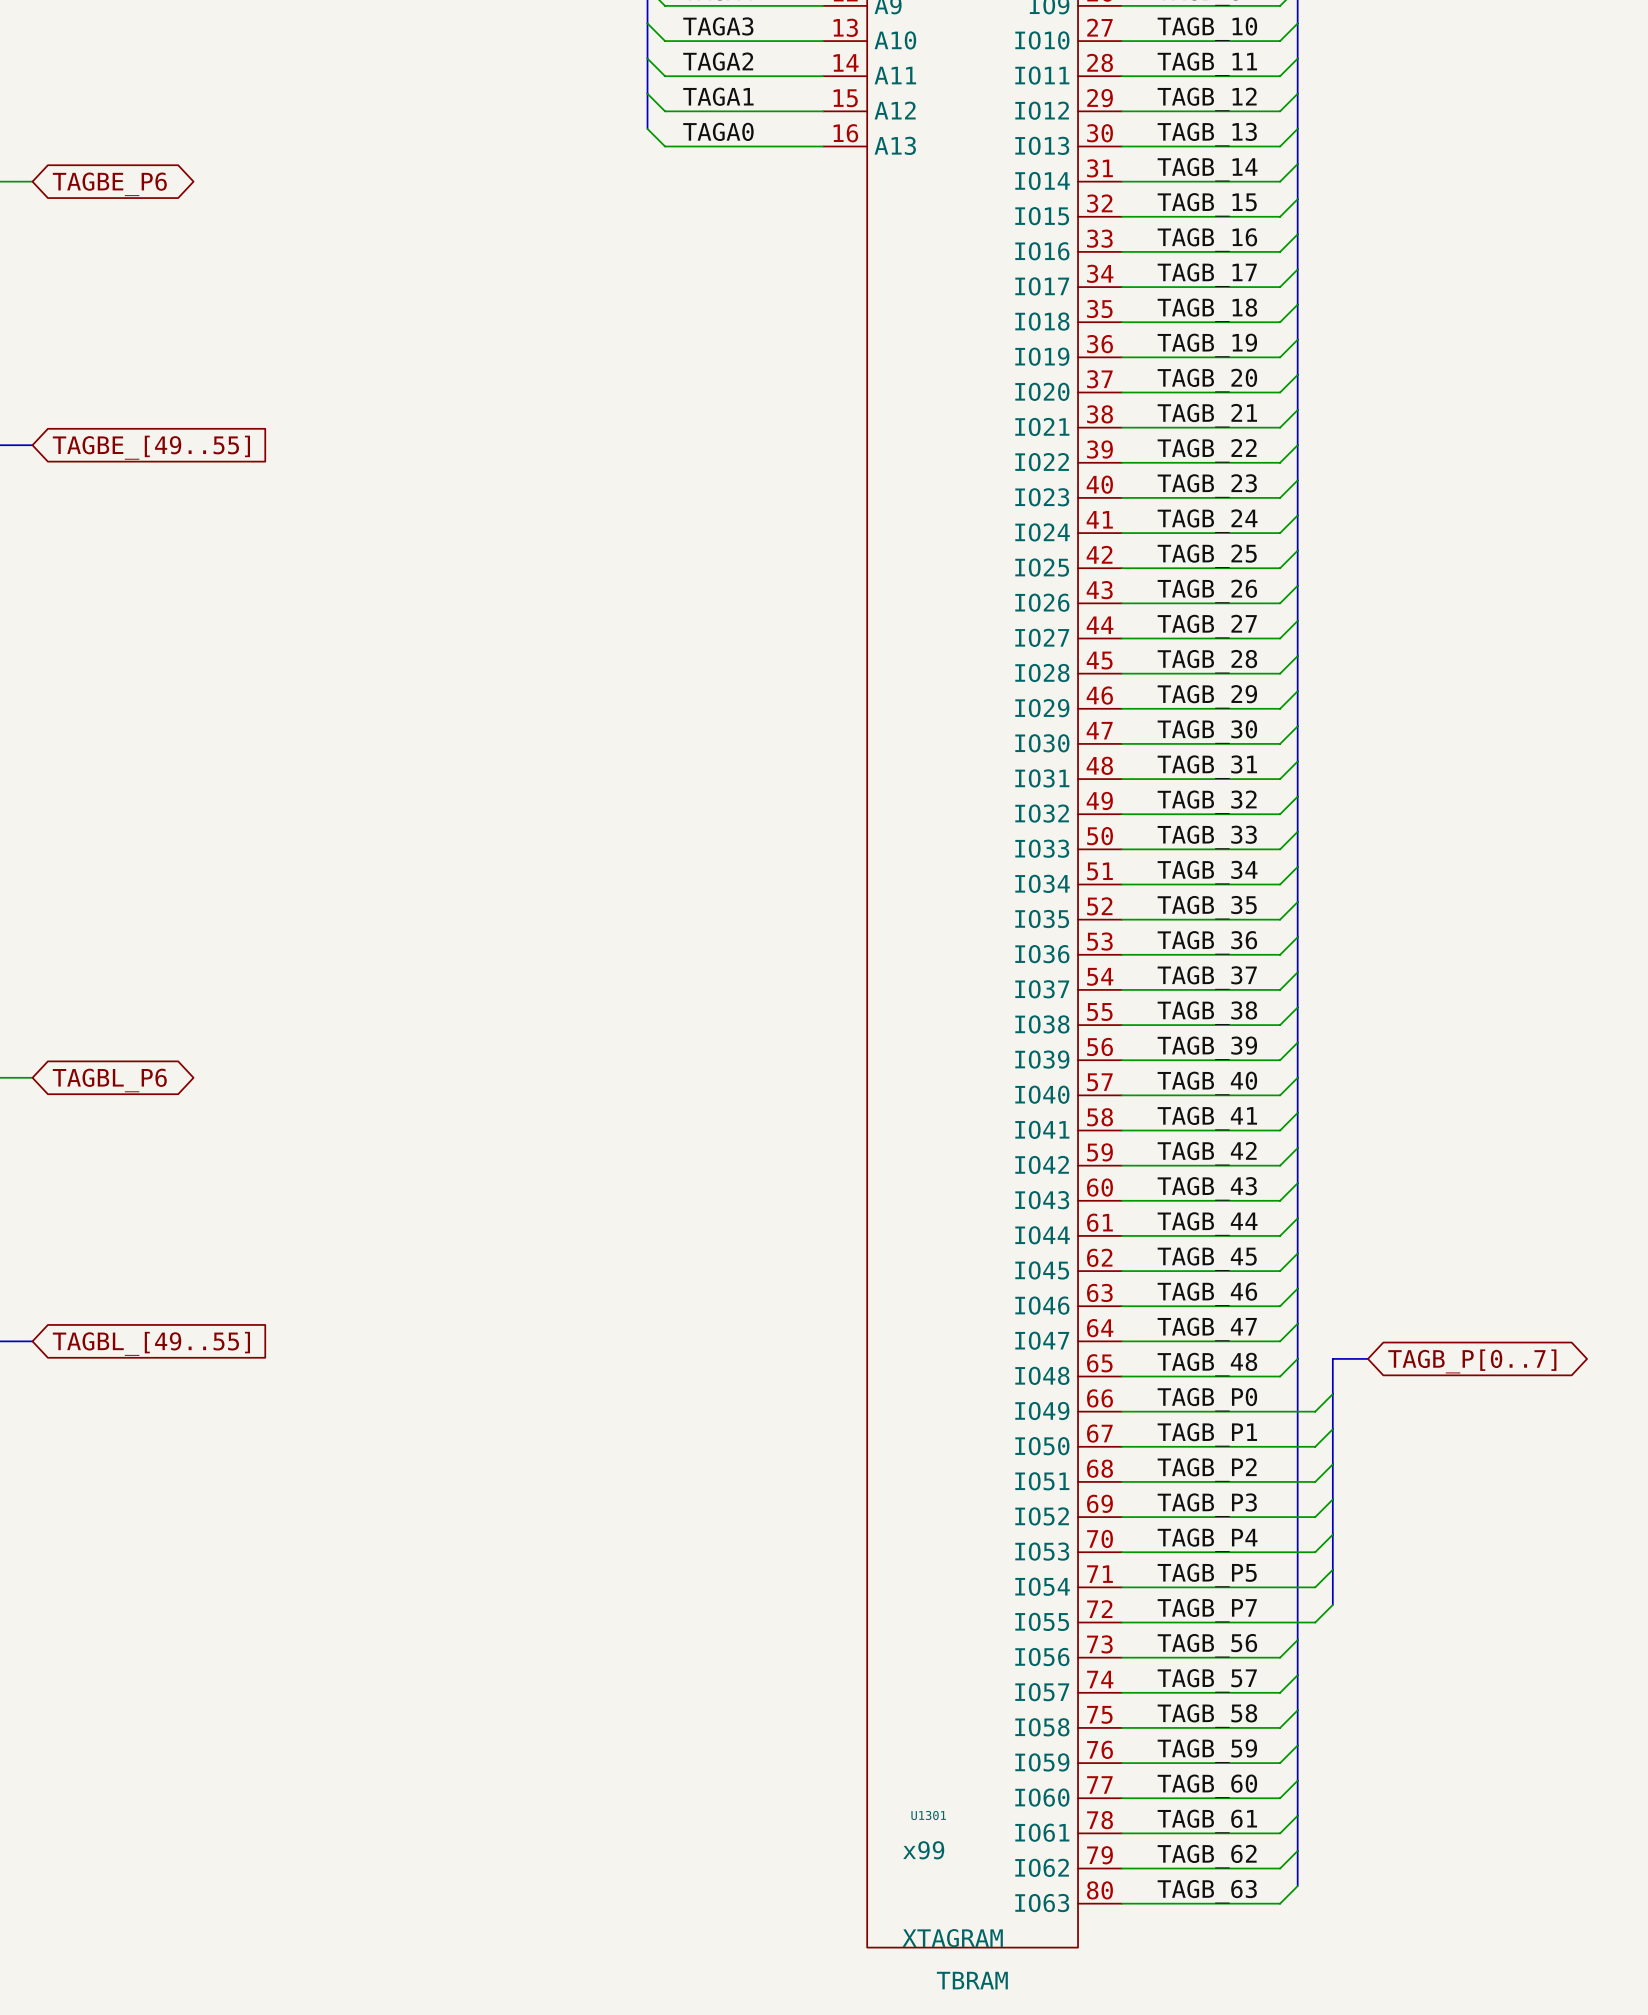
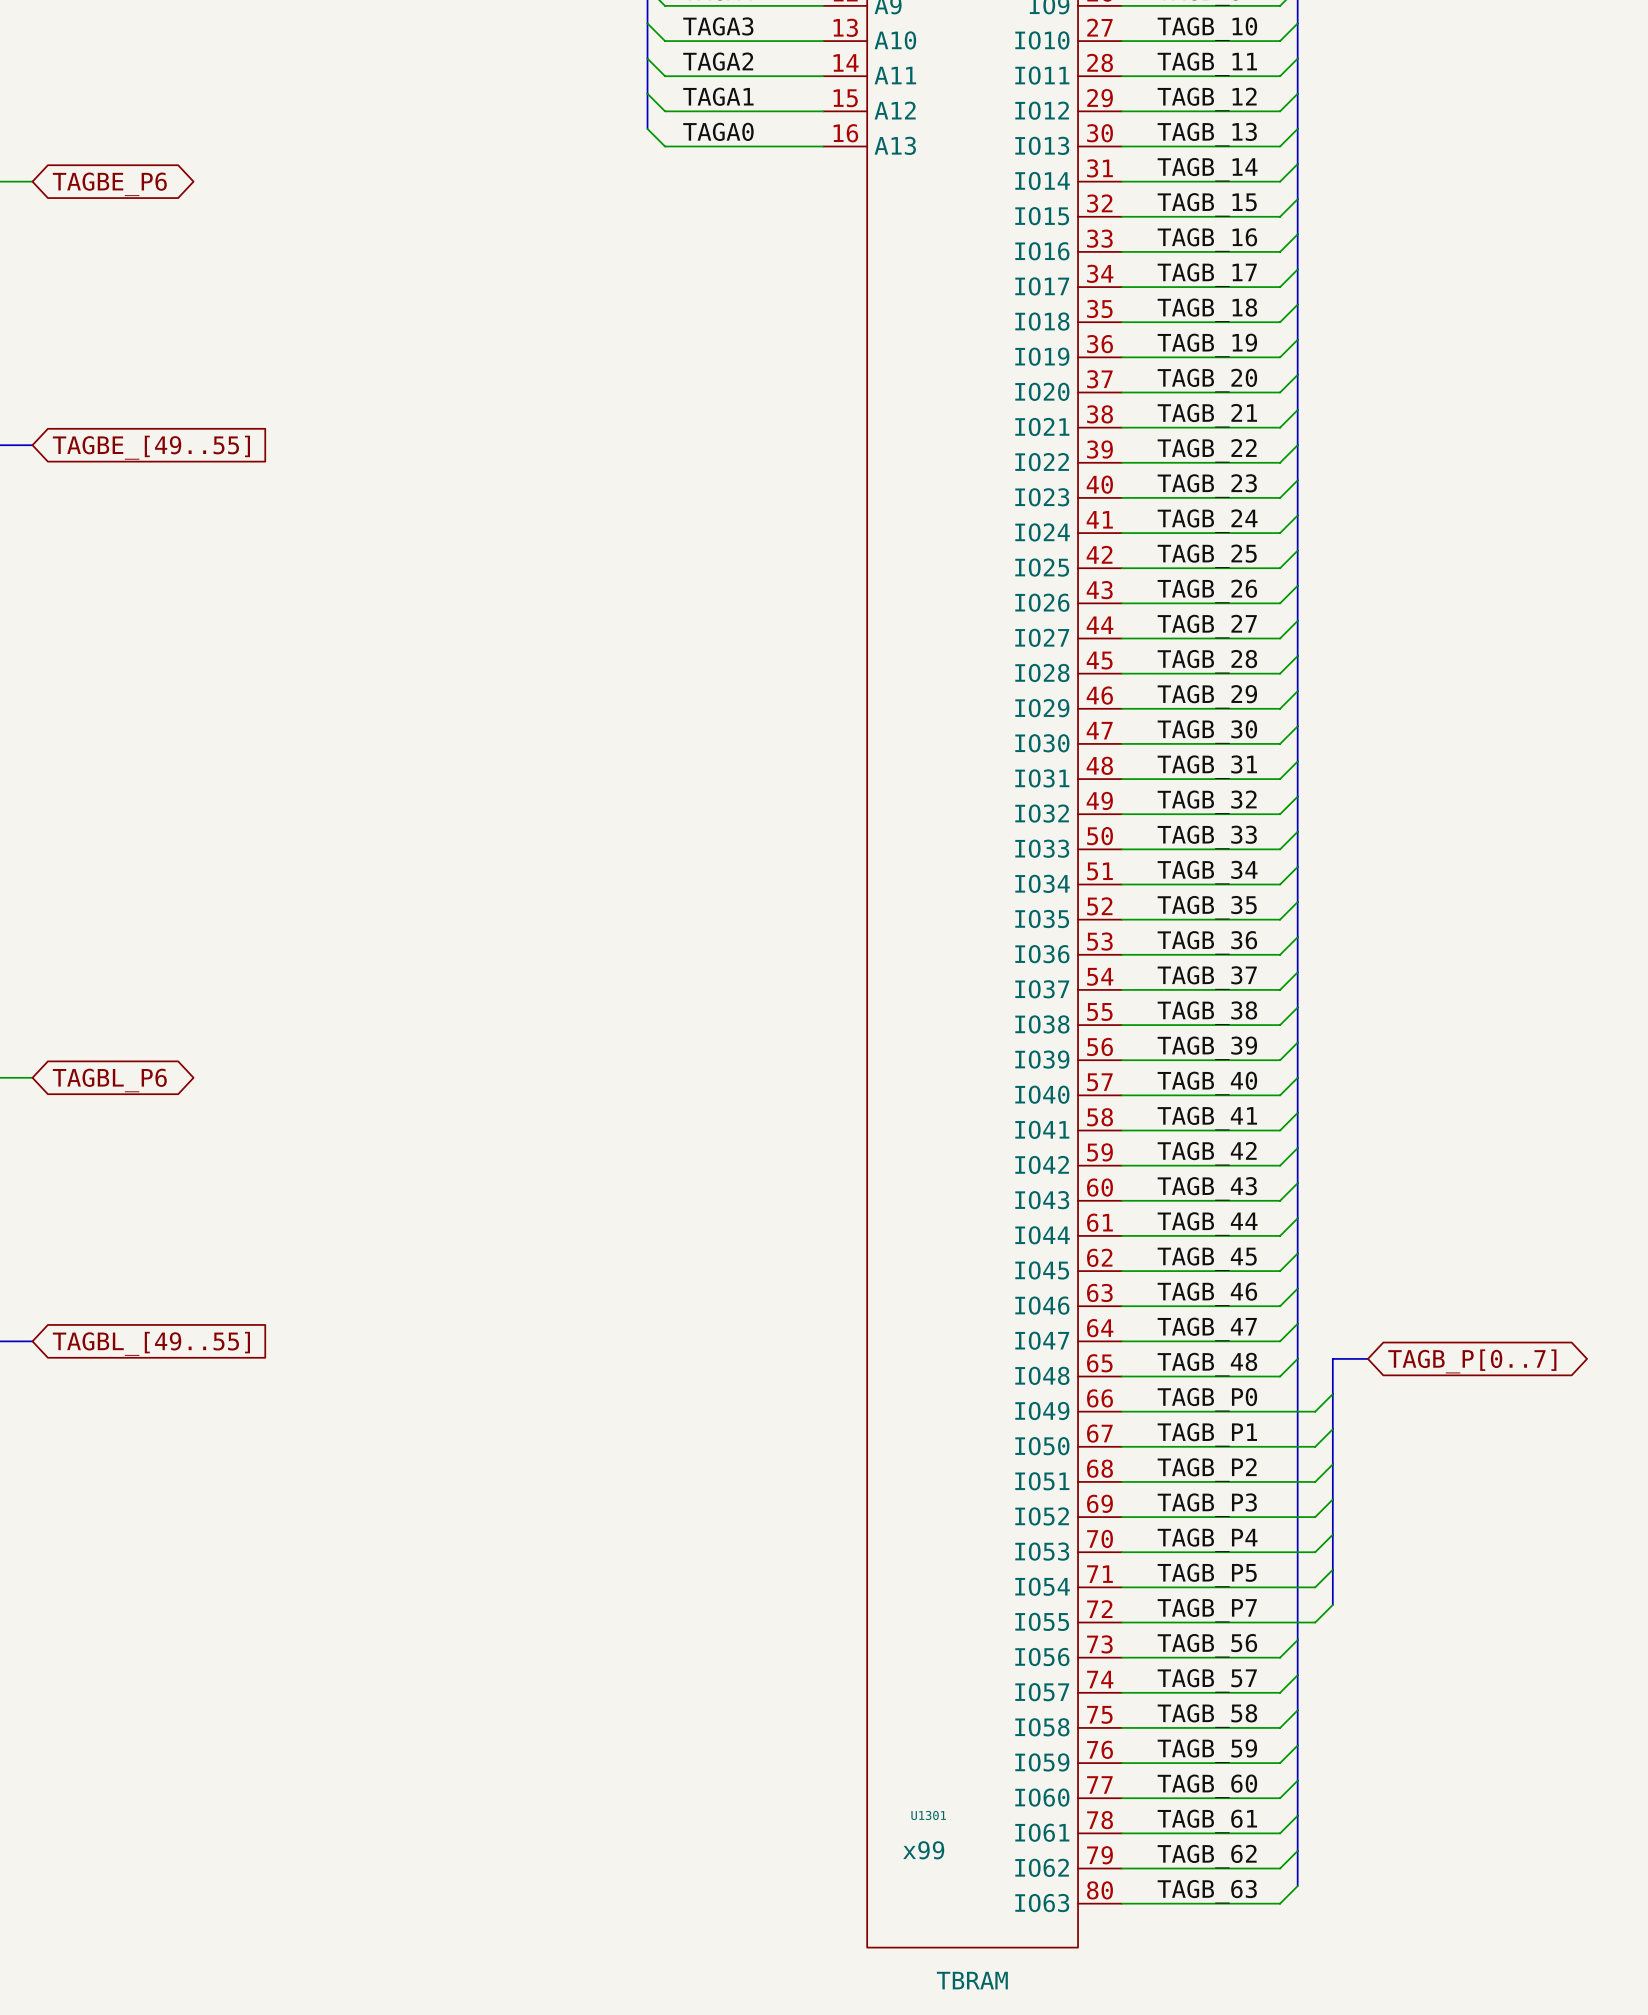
U1301 value: XTAGRAM (952, 1938) -> none

